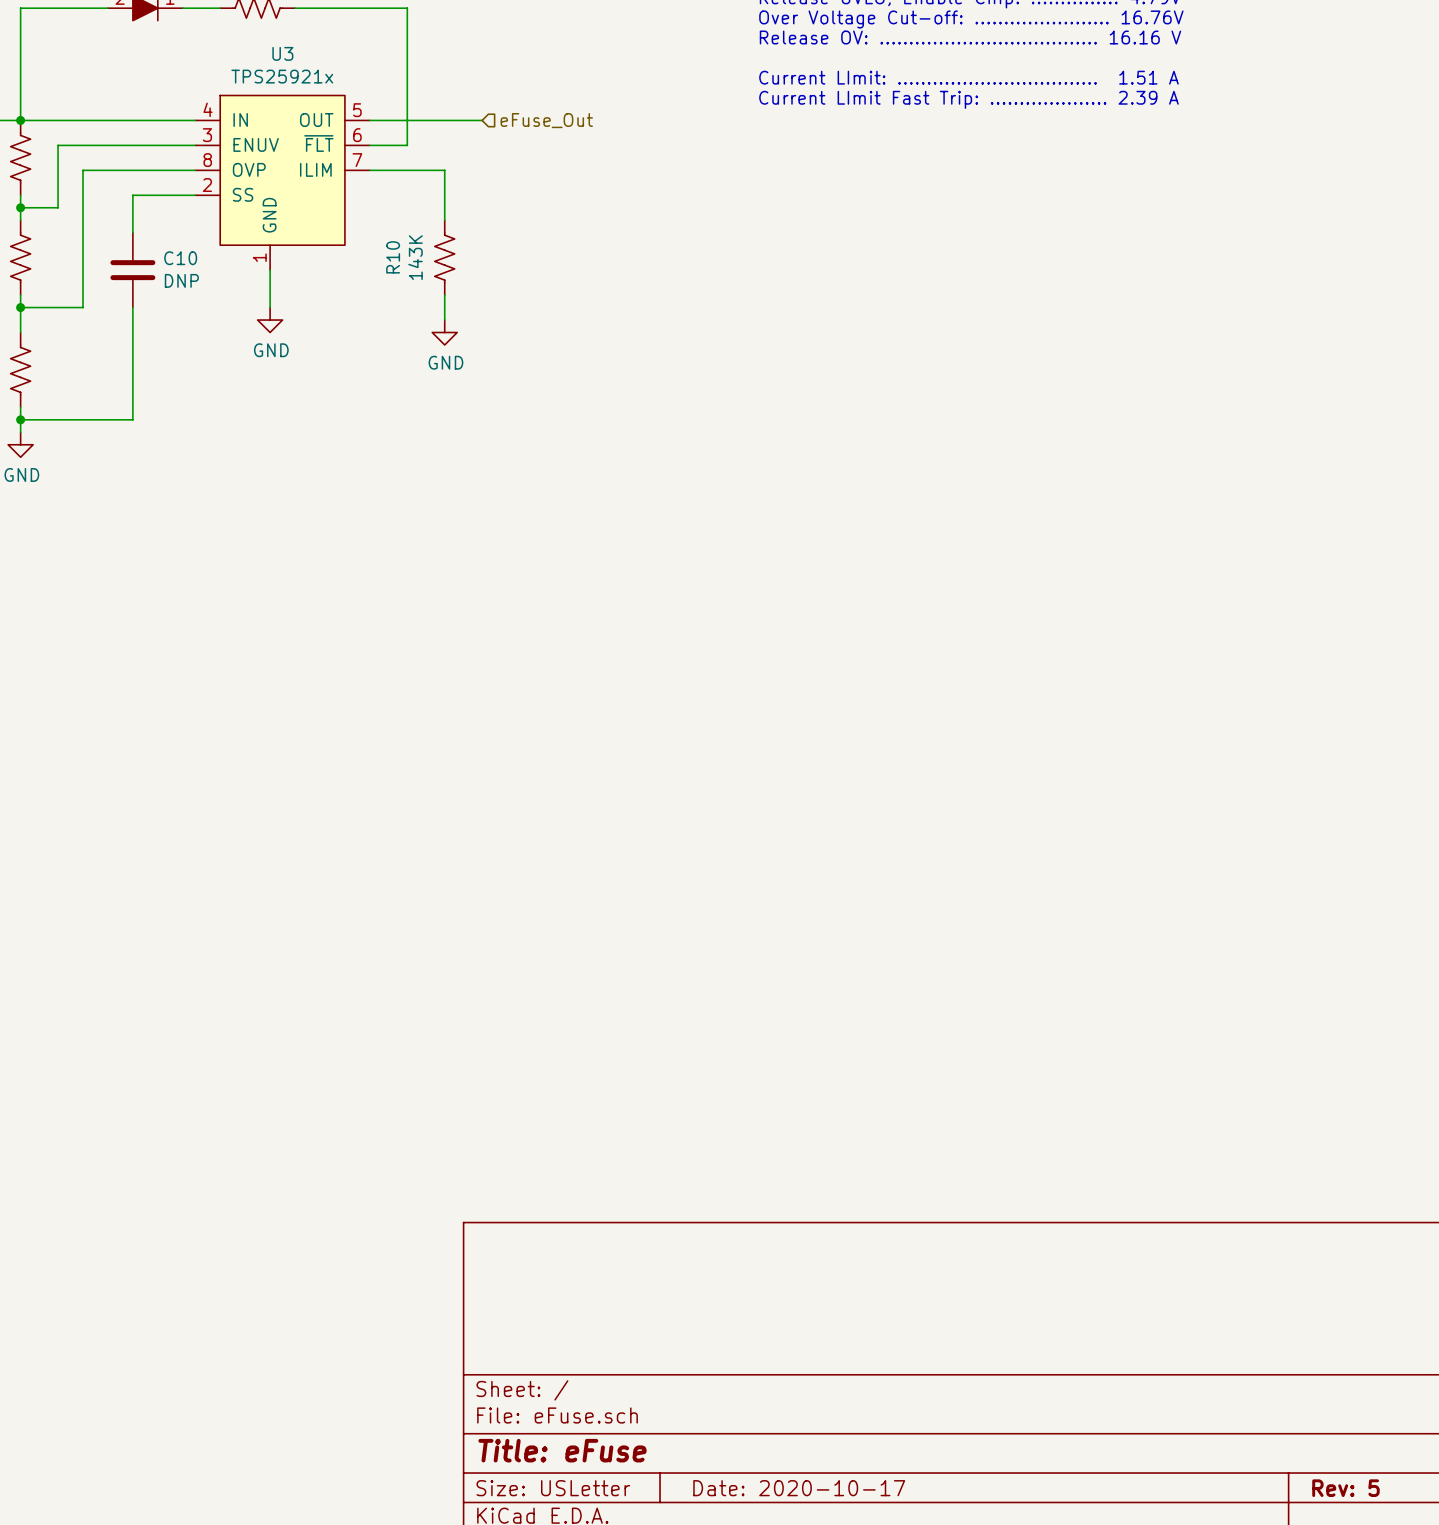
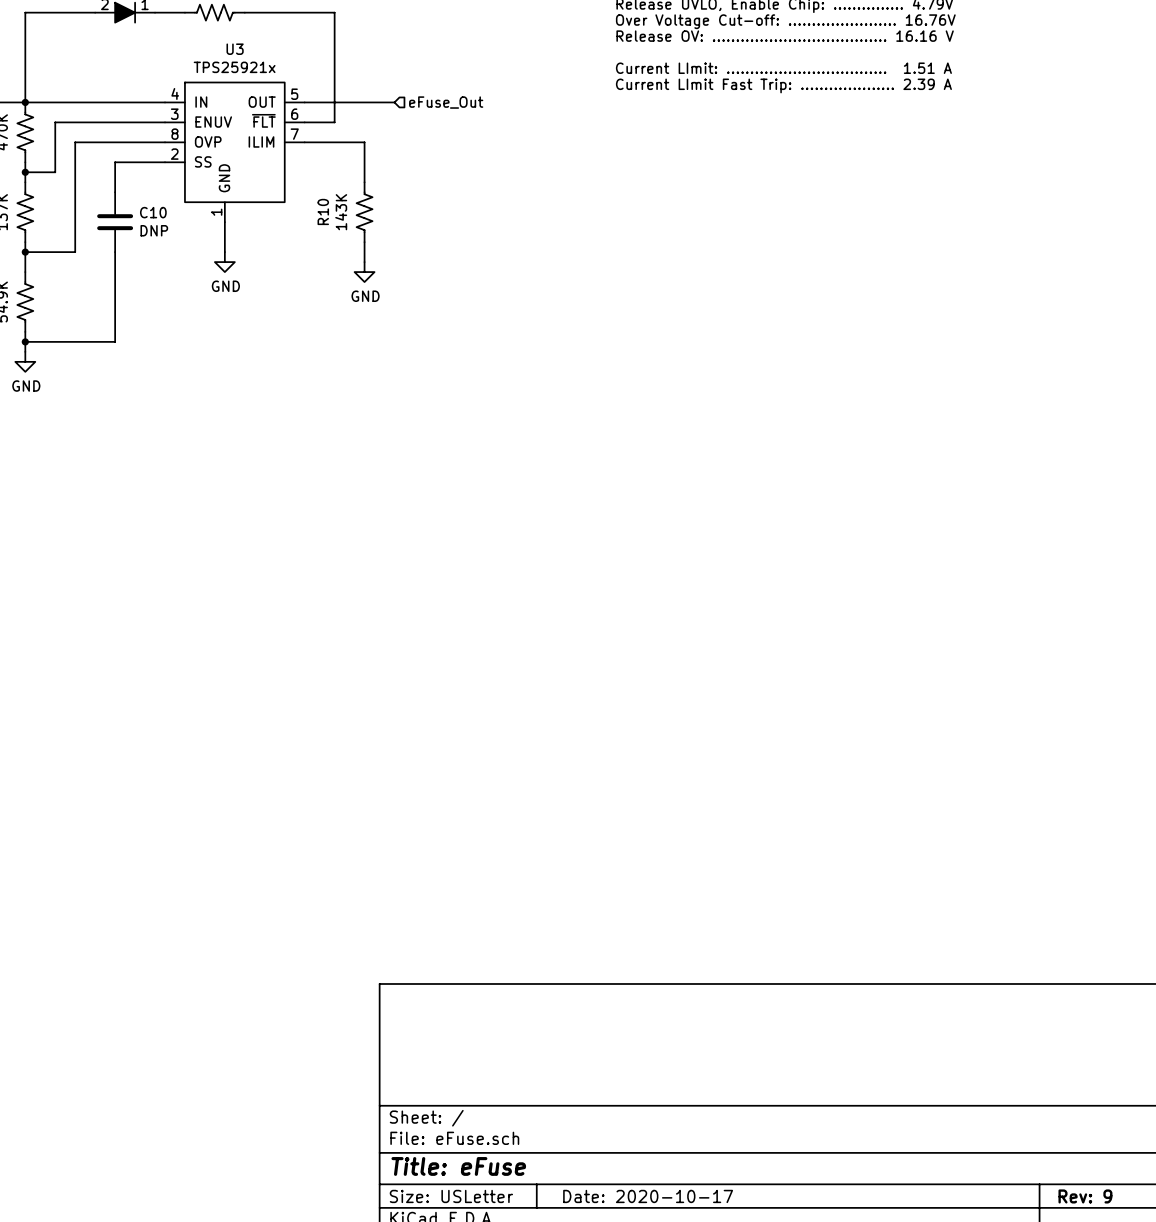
title block: Rev: 5 (1345, 1488) -> Rev: 9 (1085, 1196)

